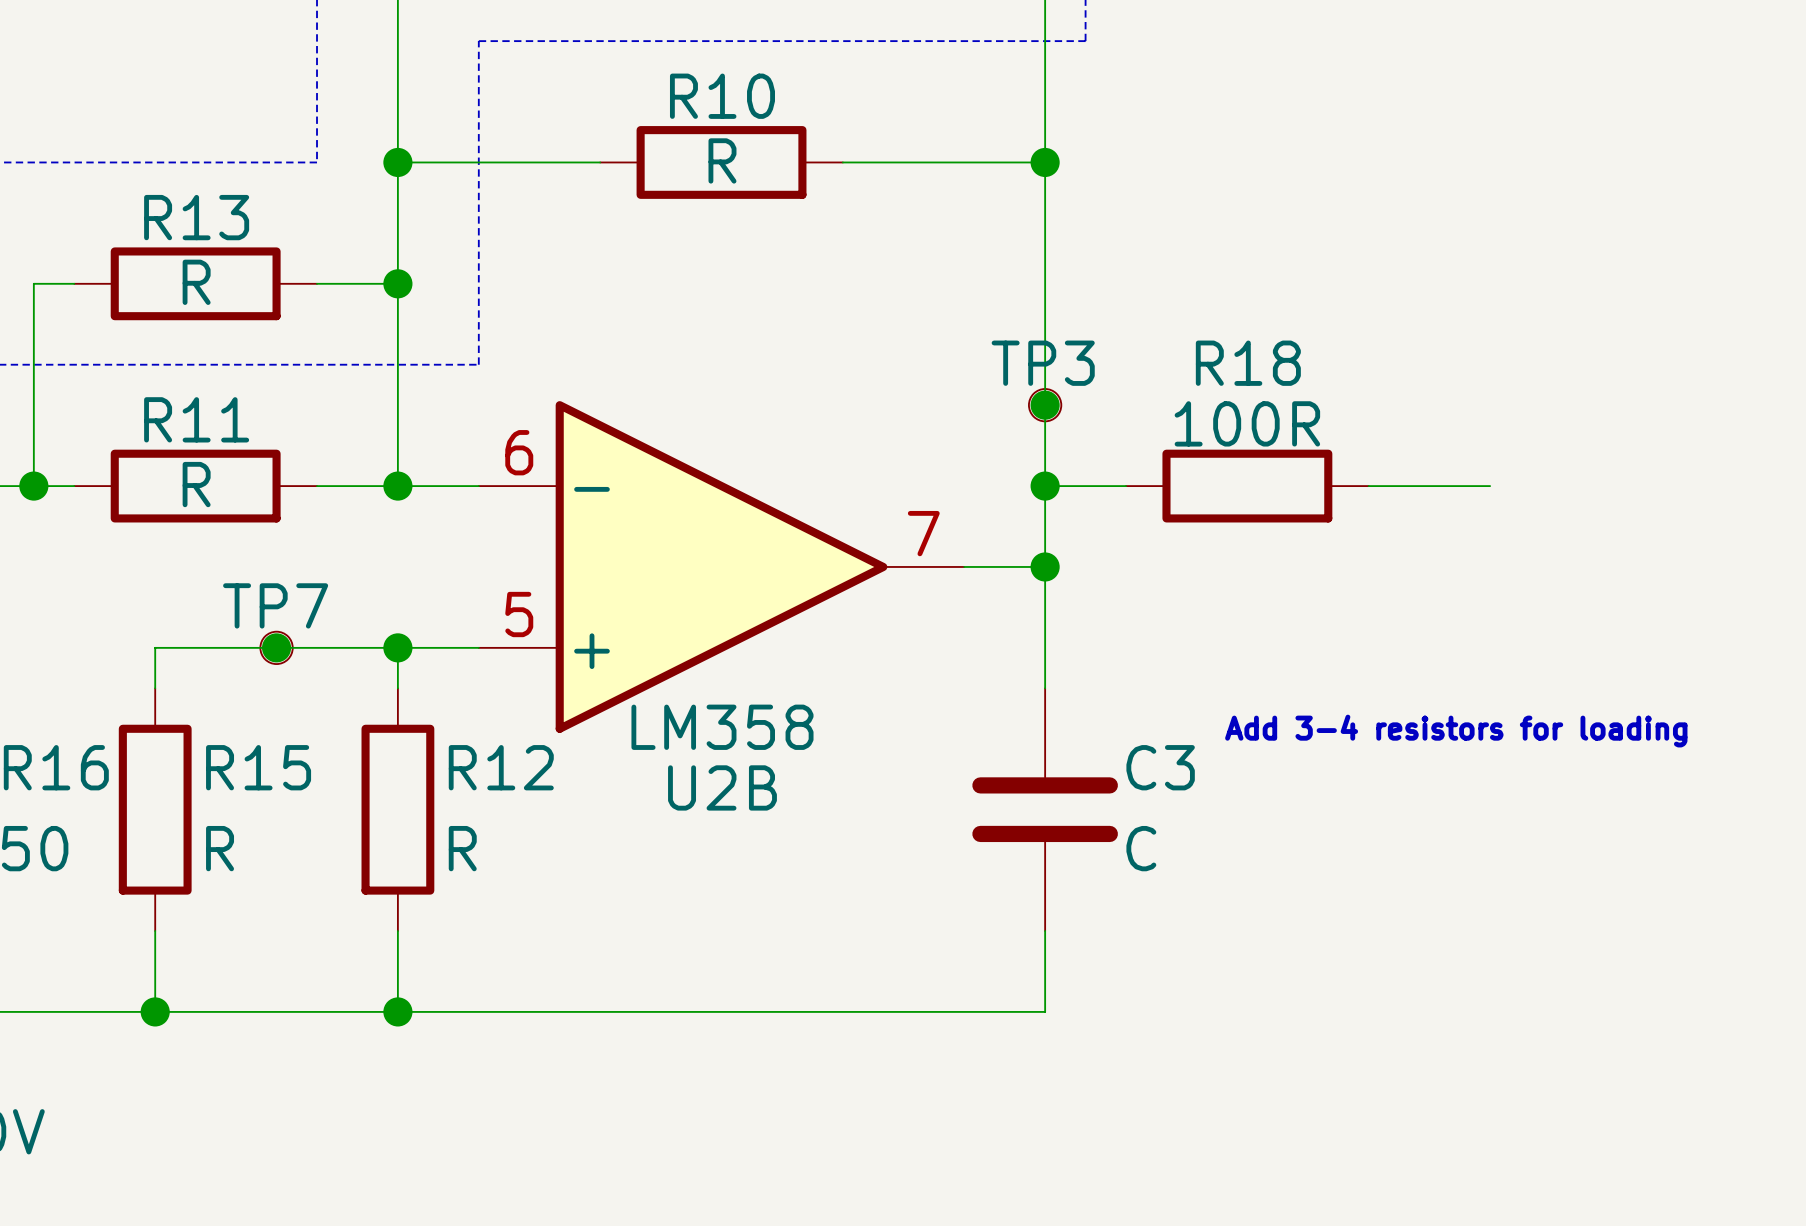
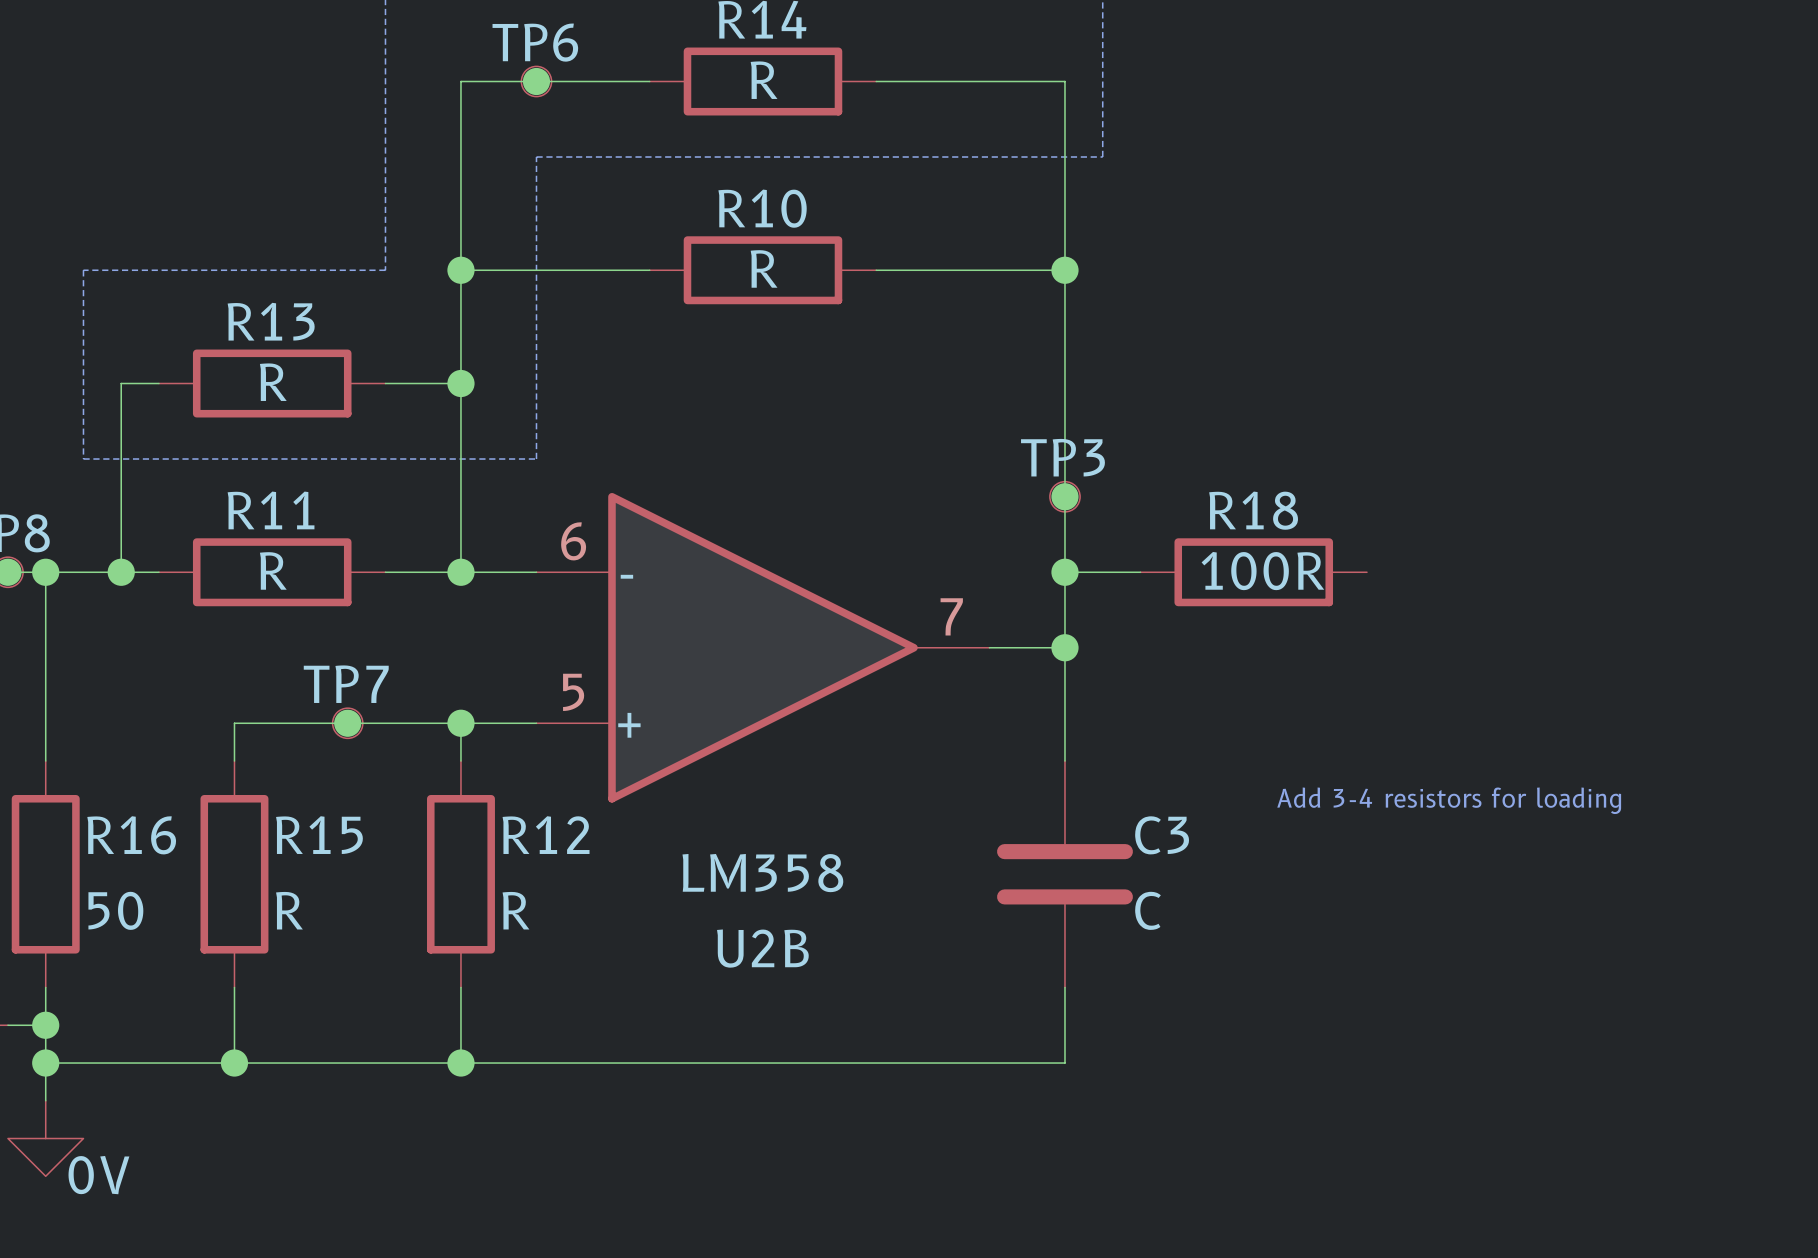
R18 name position: R18 (1248, 363) -> R18 (1253, 510)
R18 value position: 100R (1247, 423) -> 100R (1262, 571)
wire: (1368, 486) (1490, 486) -> none
U2B value position: LM358 (722, 727) -> LM358 (762, 873)
U2B name position: U2B (722, 787) -> U2B (762, 948)

